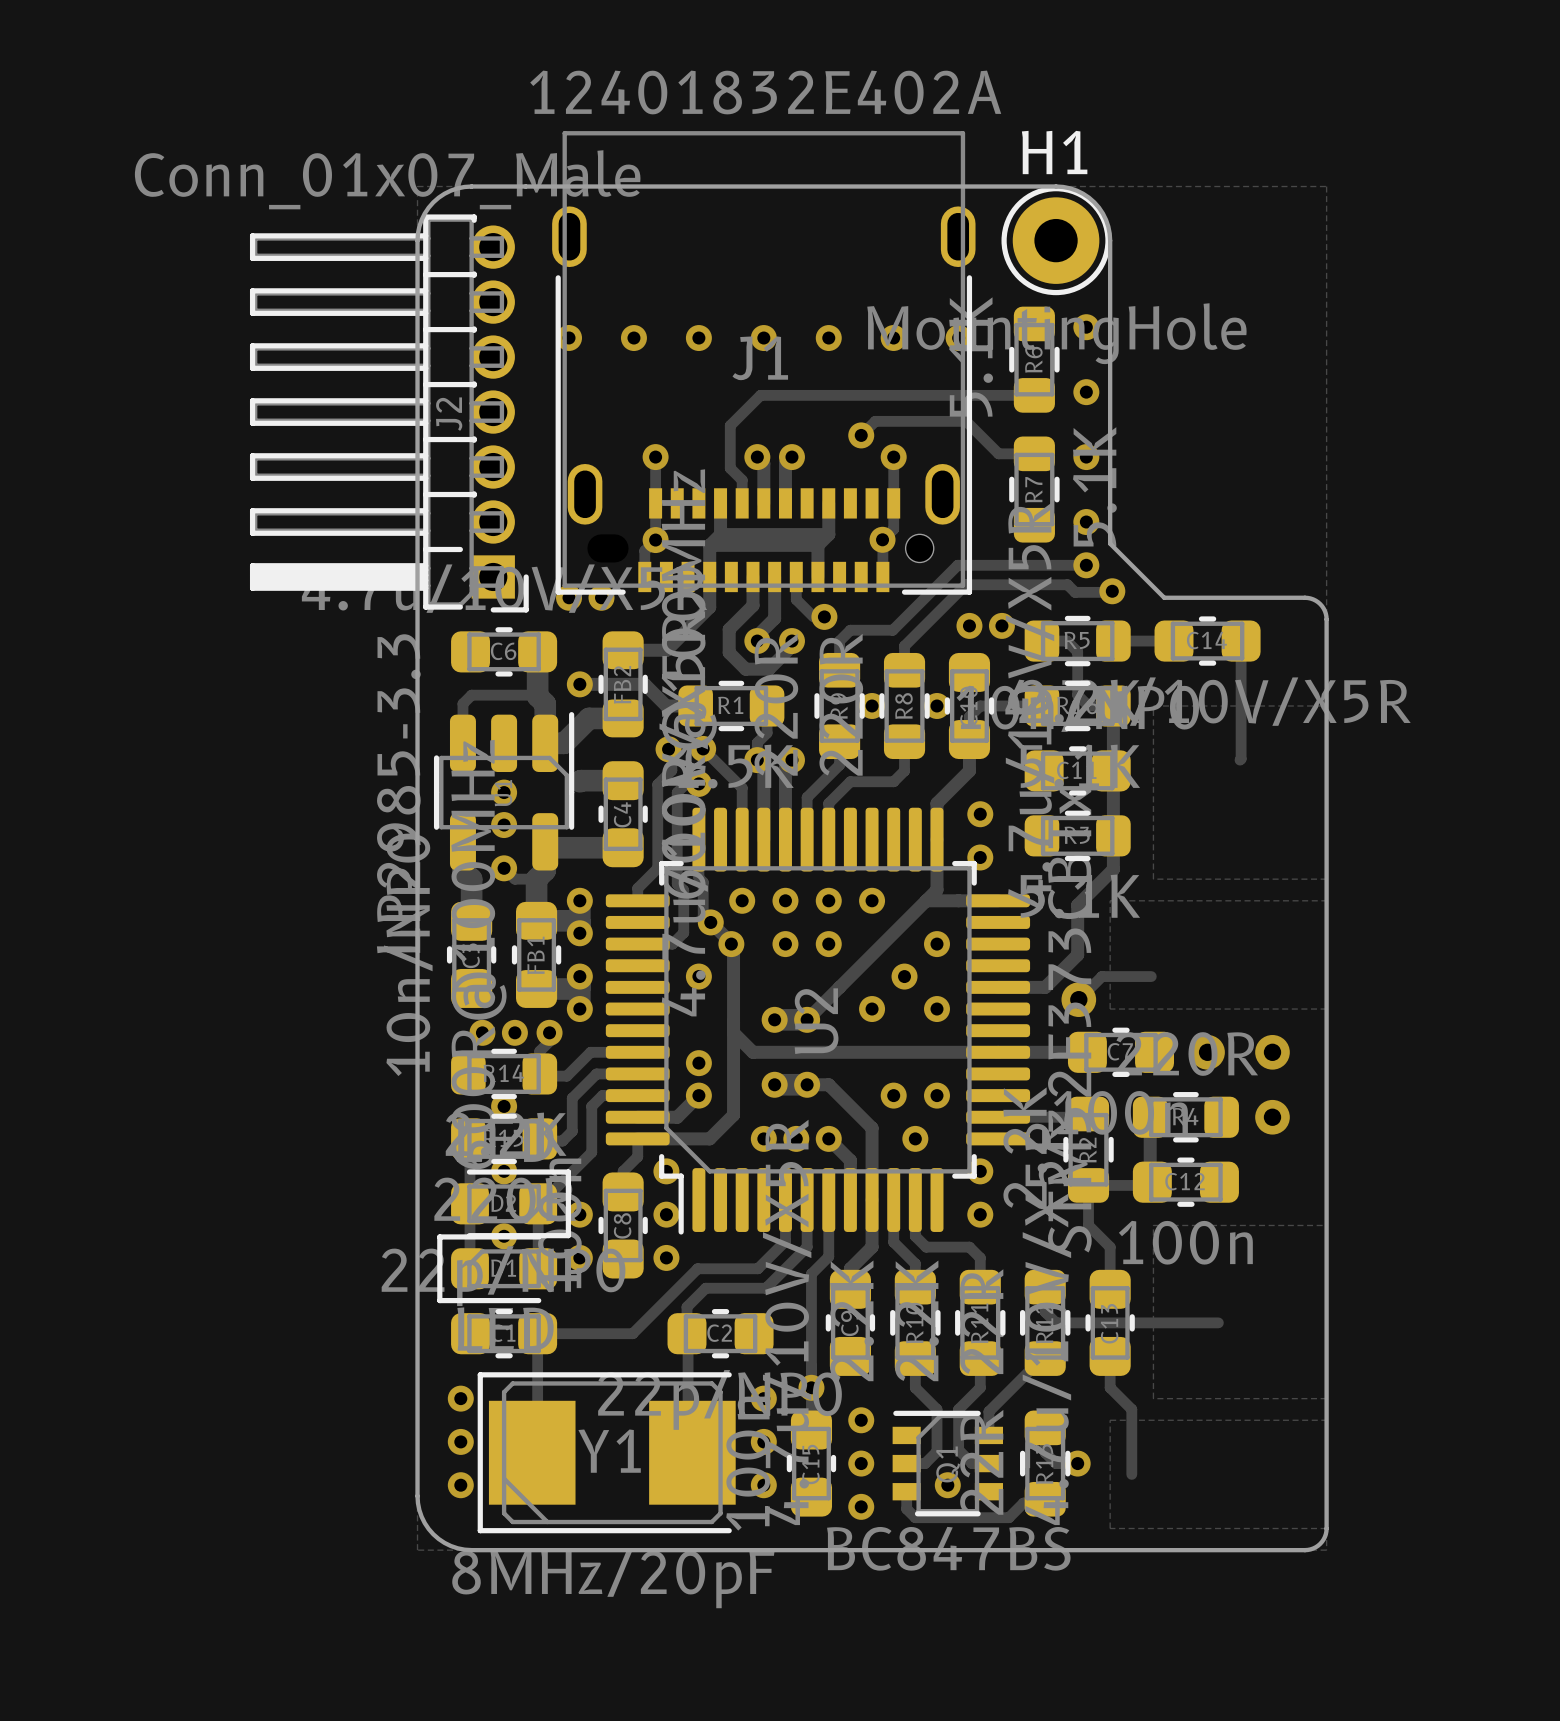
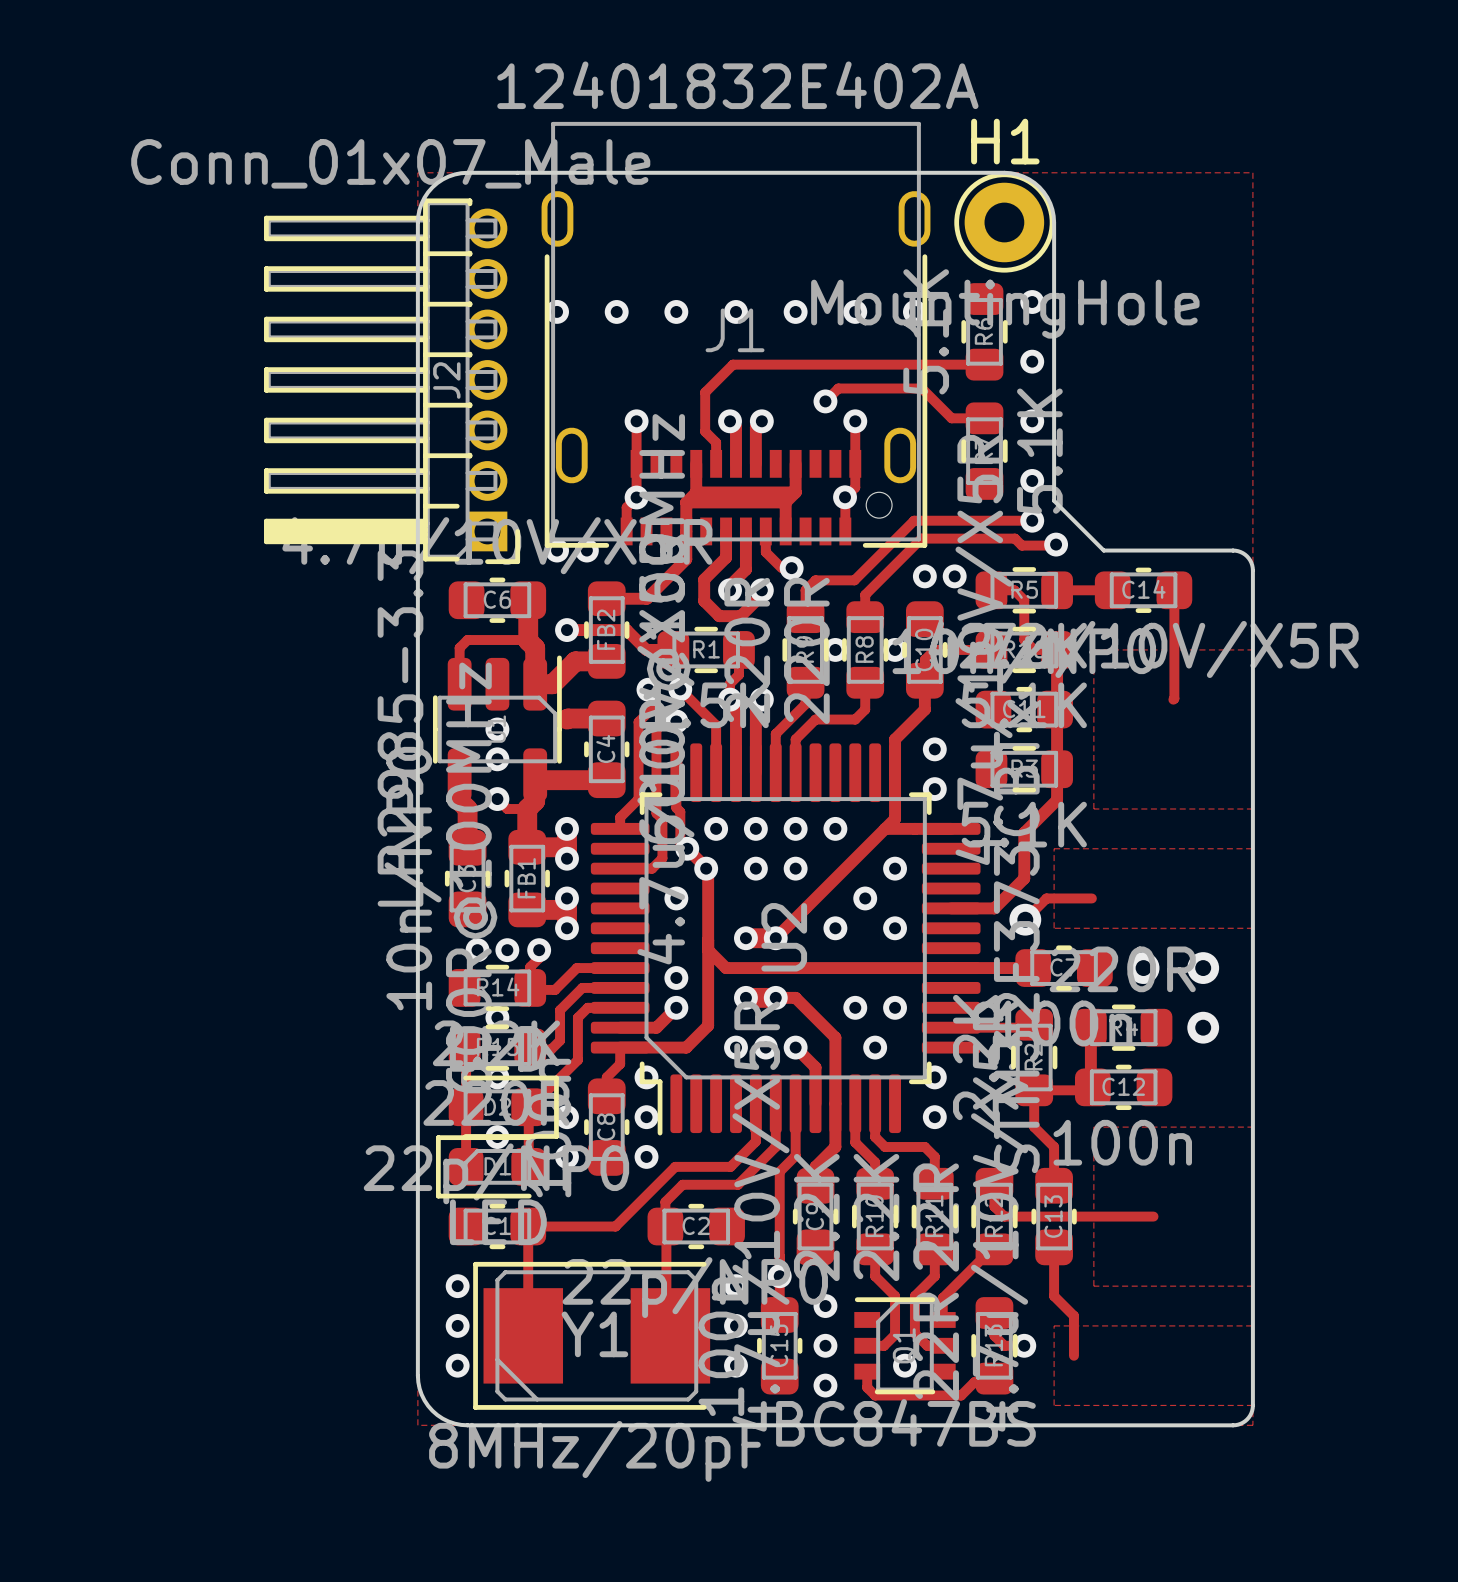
zone outline: (1326, 900) (1110, 900) (1110, 922) -> (1252, 848) (1054, 848)
track: (1110, 1387) (1131, 1409) (1131, 1431) -> (1054, 1276) (1054, 1296) (1073, 1315)
zone outline: (1326, 1420) (1110, 1420) (1110, 1441) -> (1252, 1325) (1054, 1325)

